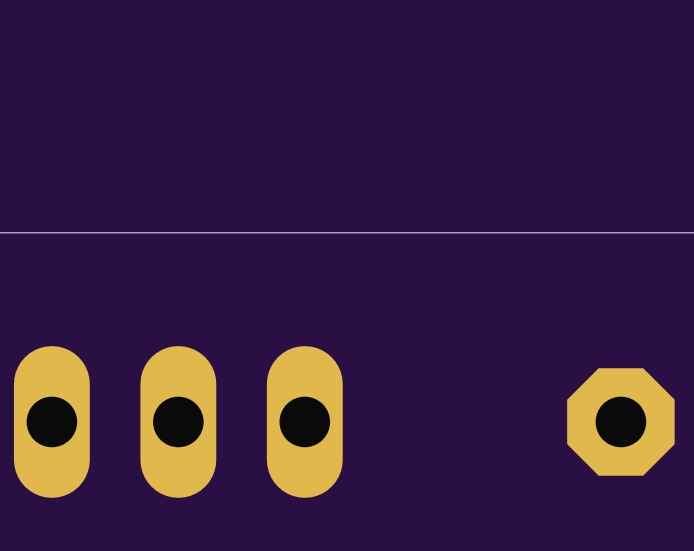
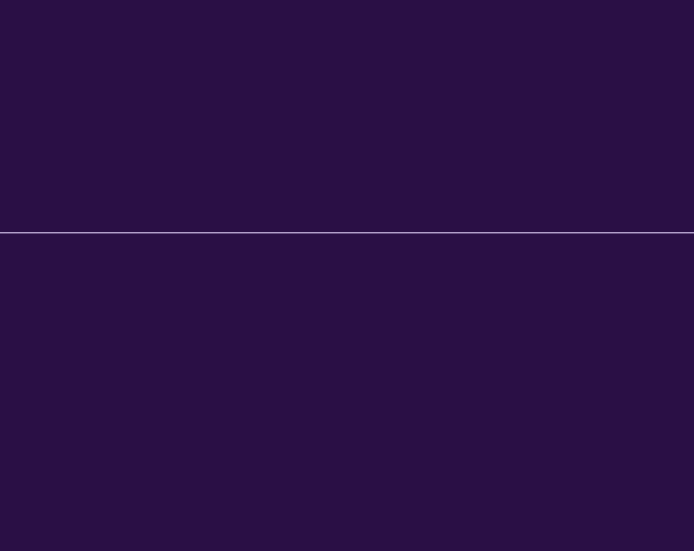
part: (178, 421) -> none
part: (620, 421) -> none

